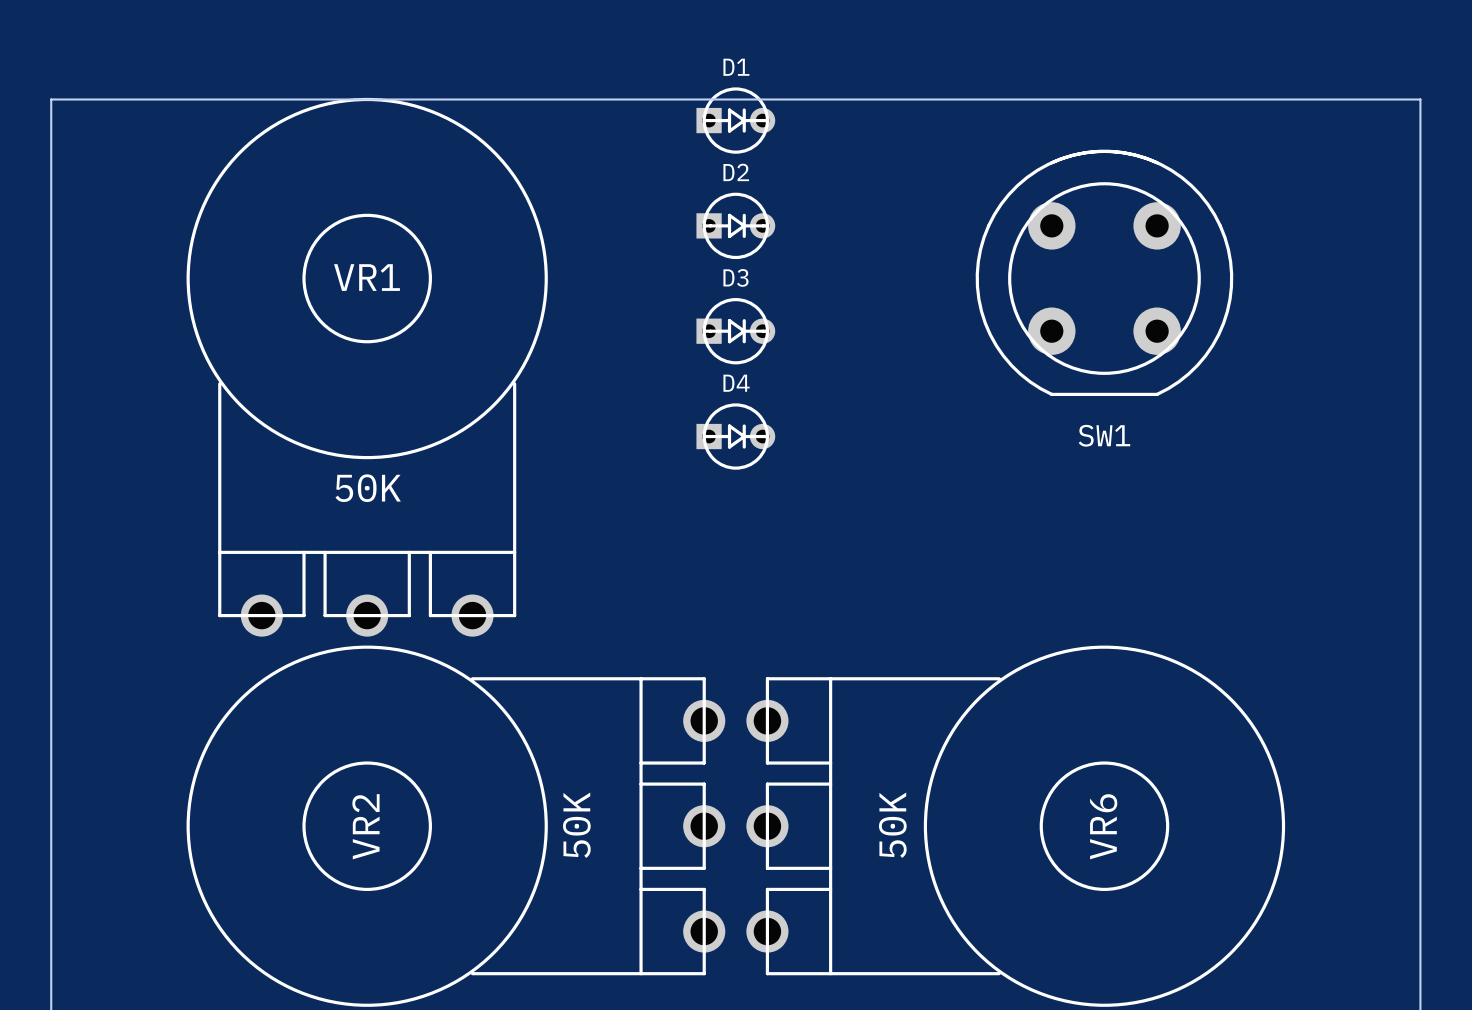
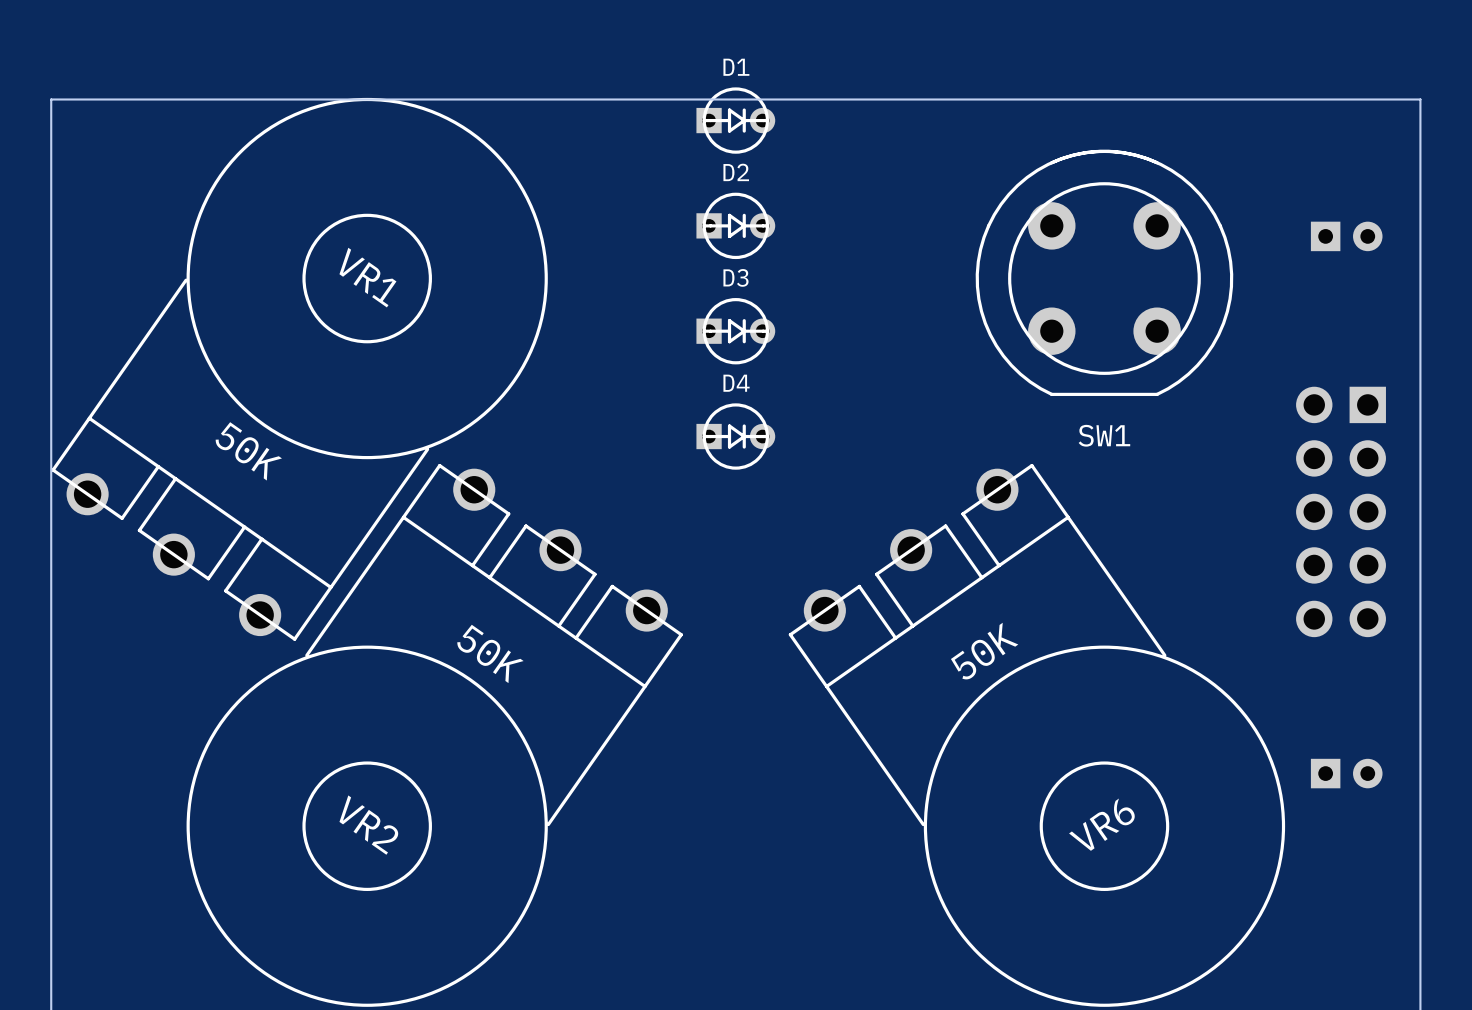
part: none -> (1346, 236)
VR1 rotation: 0° (367, 367) -> 35° clockwise (299, 369)
part: none -> (1341, 511)
part: none -> (1346, 773)
VR2 rotation: 0° (455, 826) -> 55° counterclockwise (434, 735)
VR6 rotation: 0° (1015, 826) -> 55° clockwise (1036, 735)

